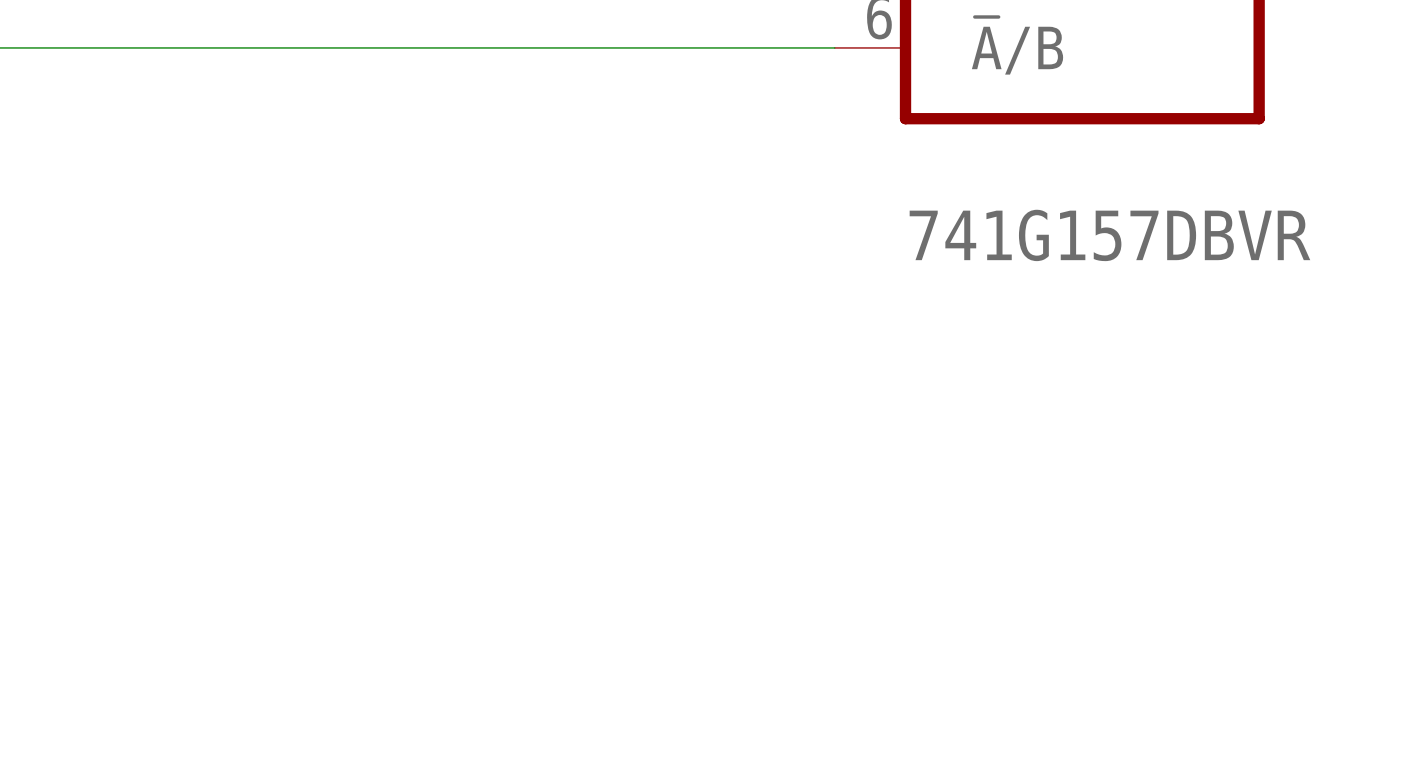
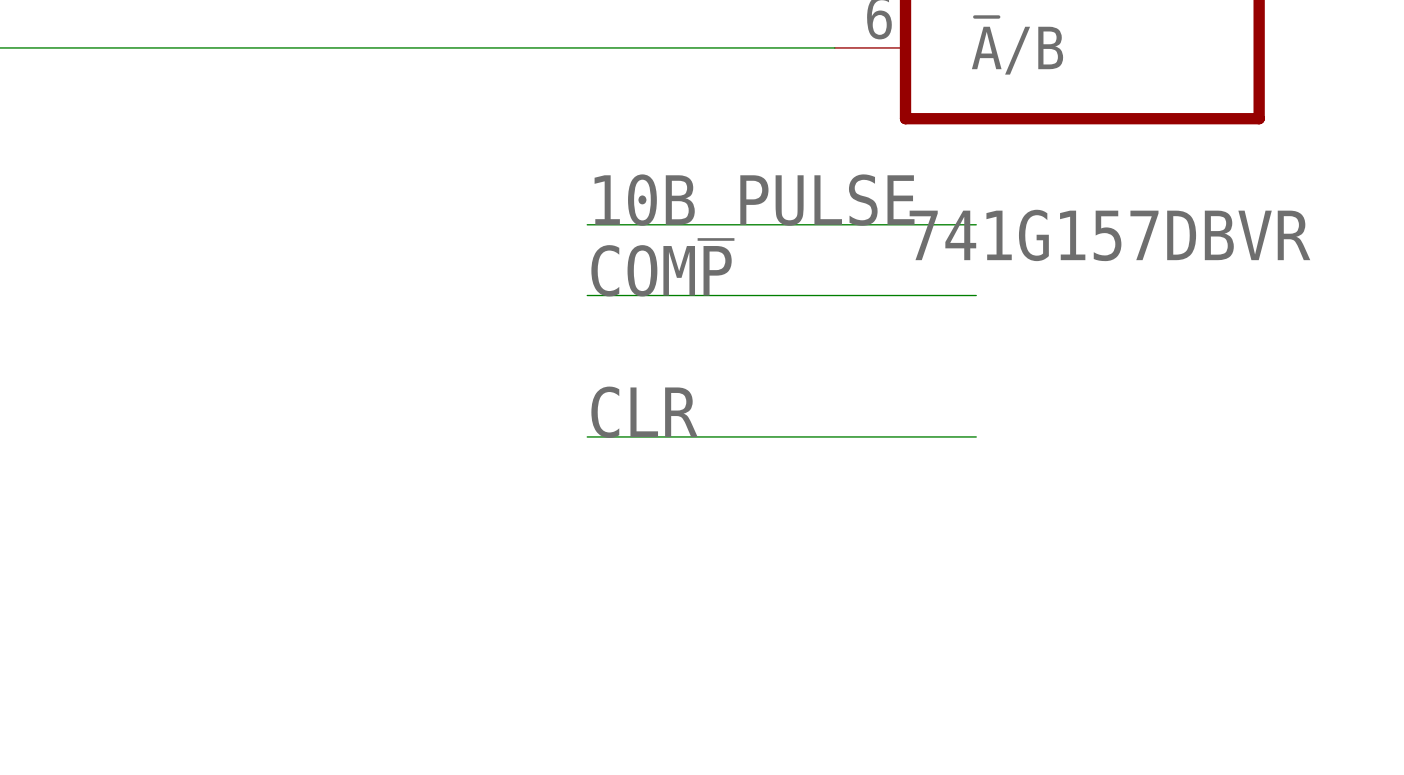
label: none -> 10B_PULSE (754, 207)
wire: none -> (587, 224) (976, 224)
label: none -> COMP (661, 270)
wire: none -> (587, 295) (976, 295)
label: none -> CLR (644, 412)
wire: none -> (587, 436) (976, 436)

